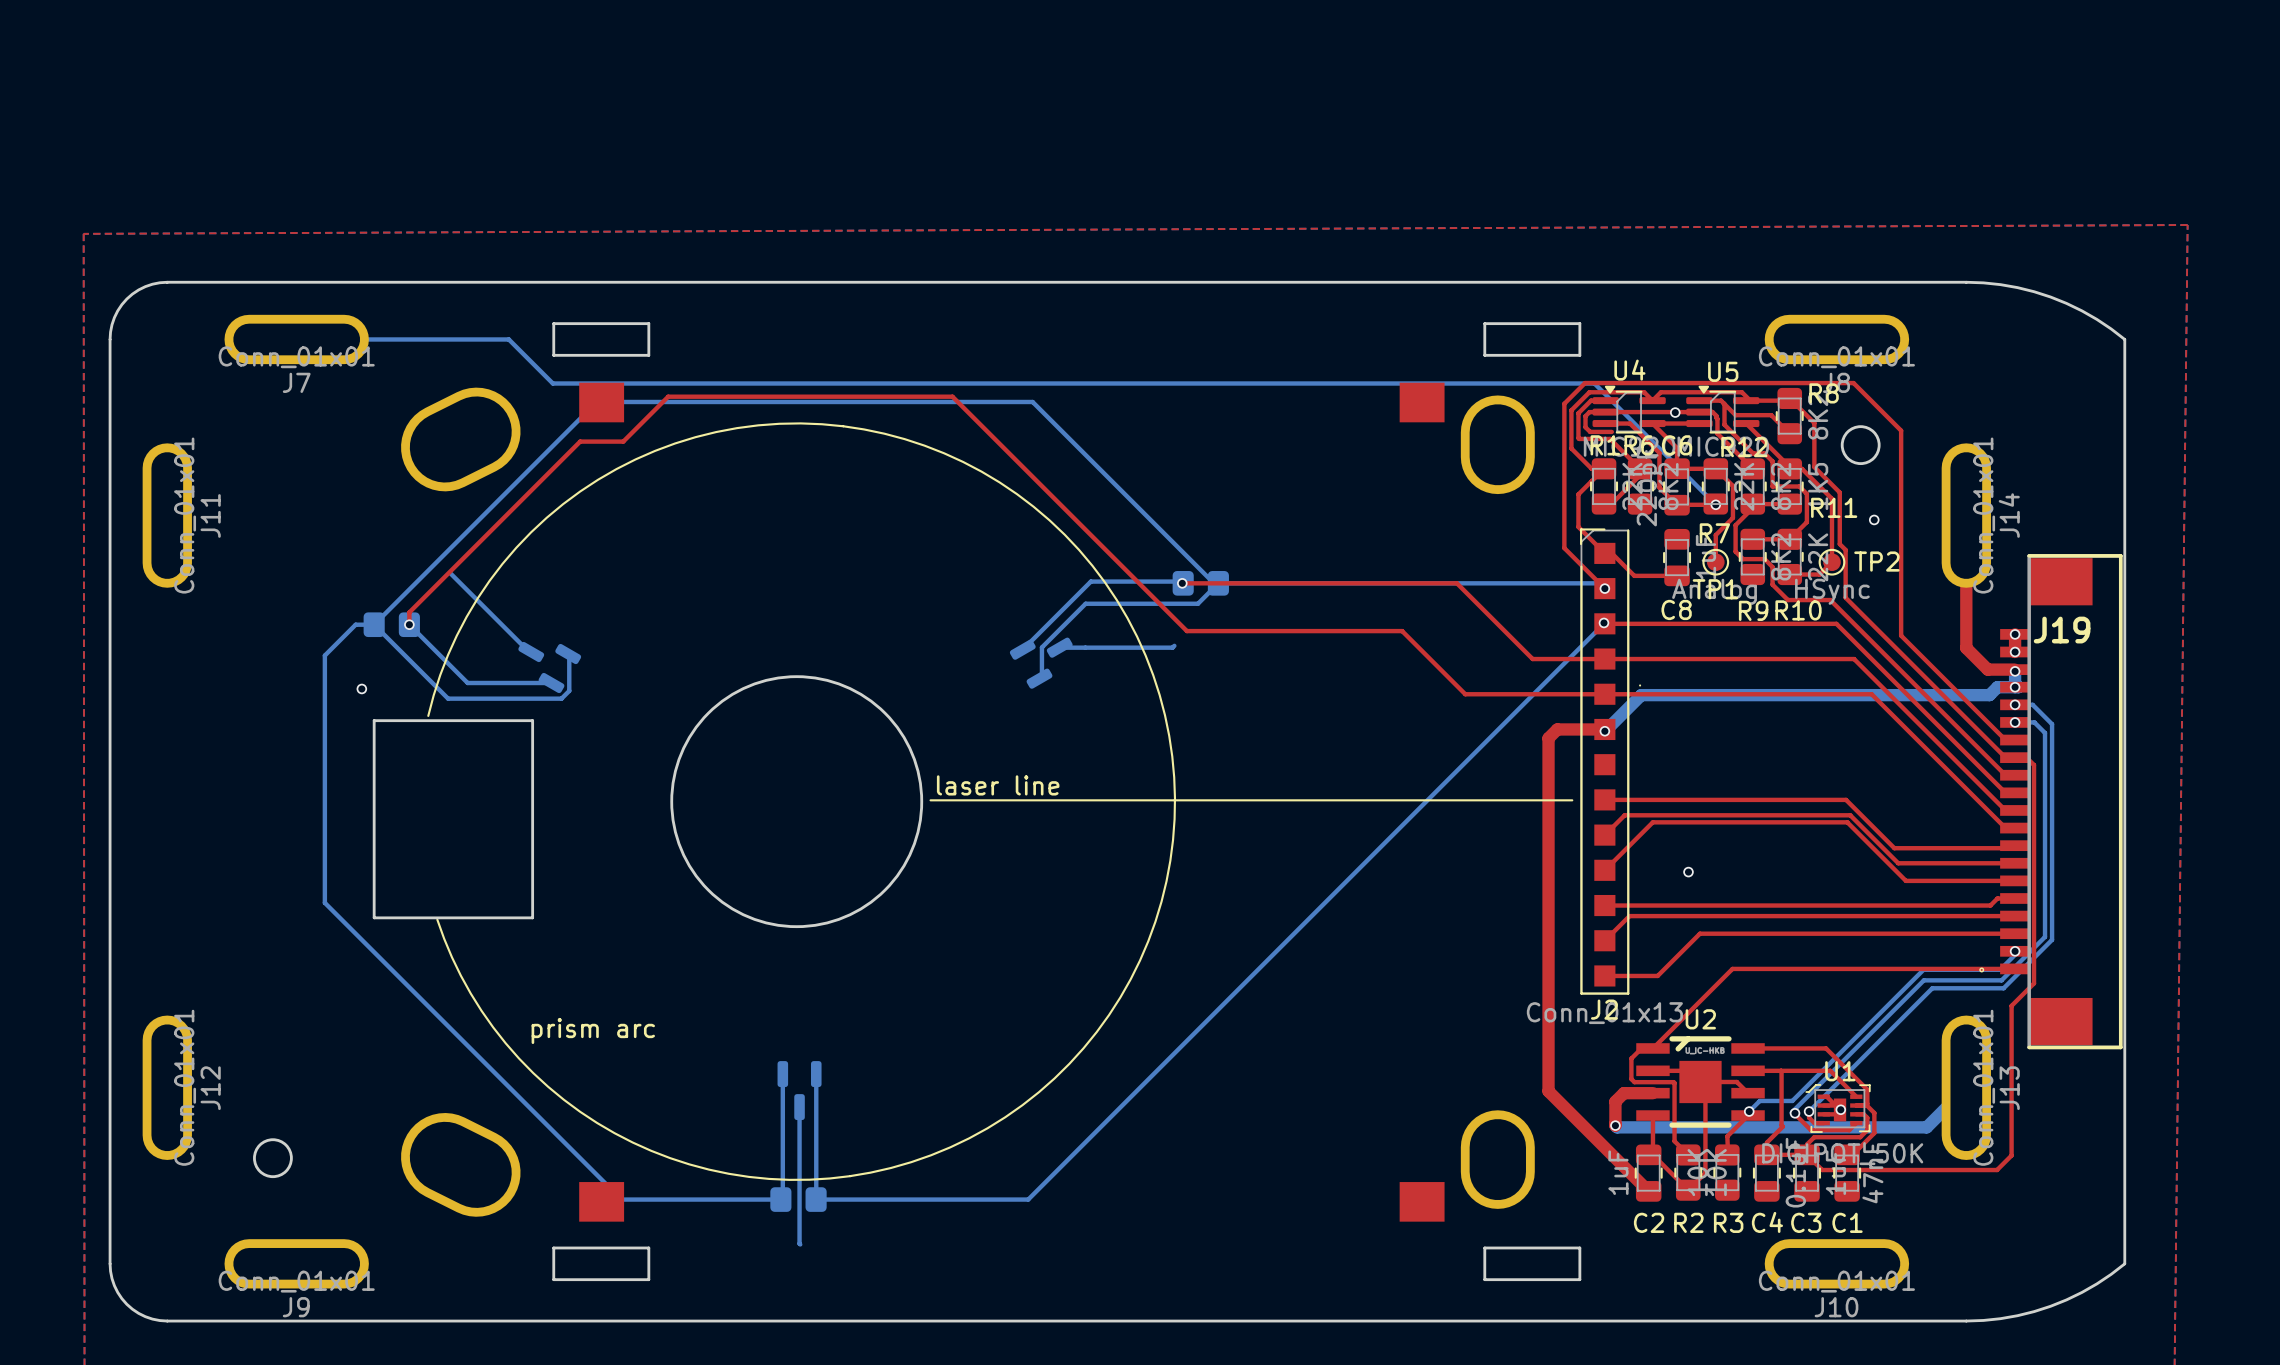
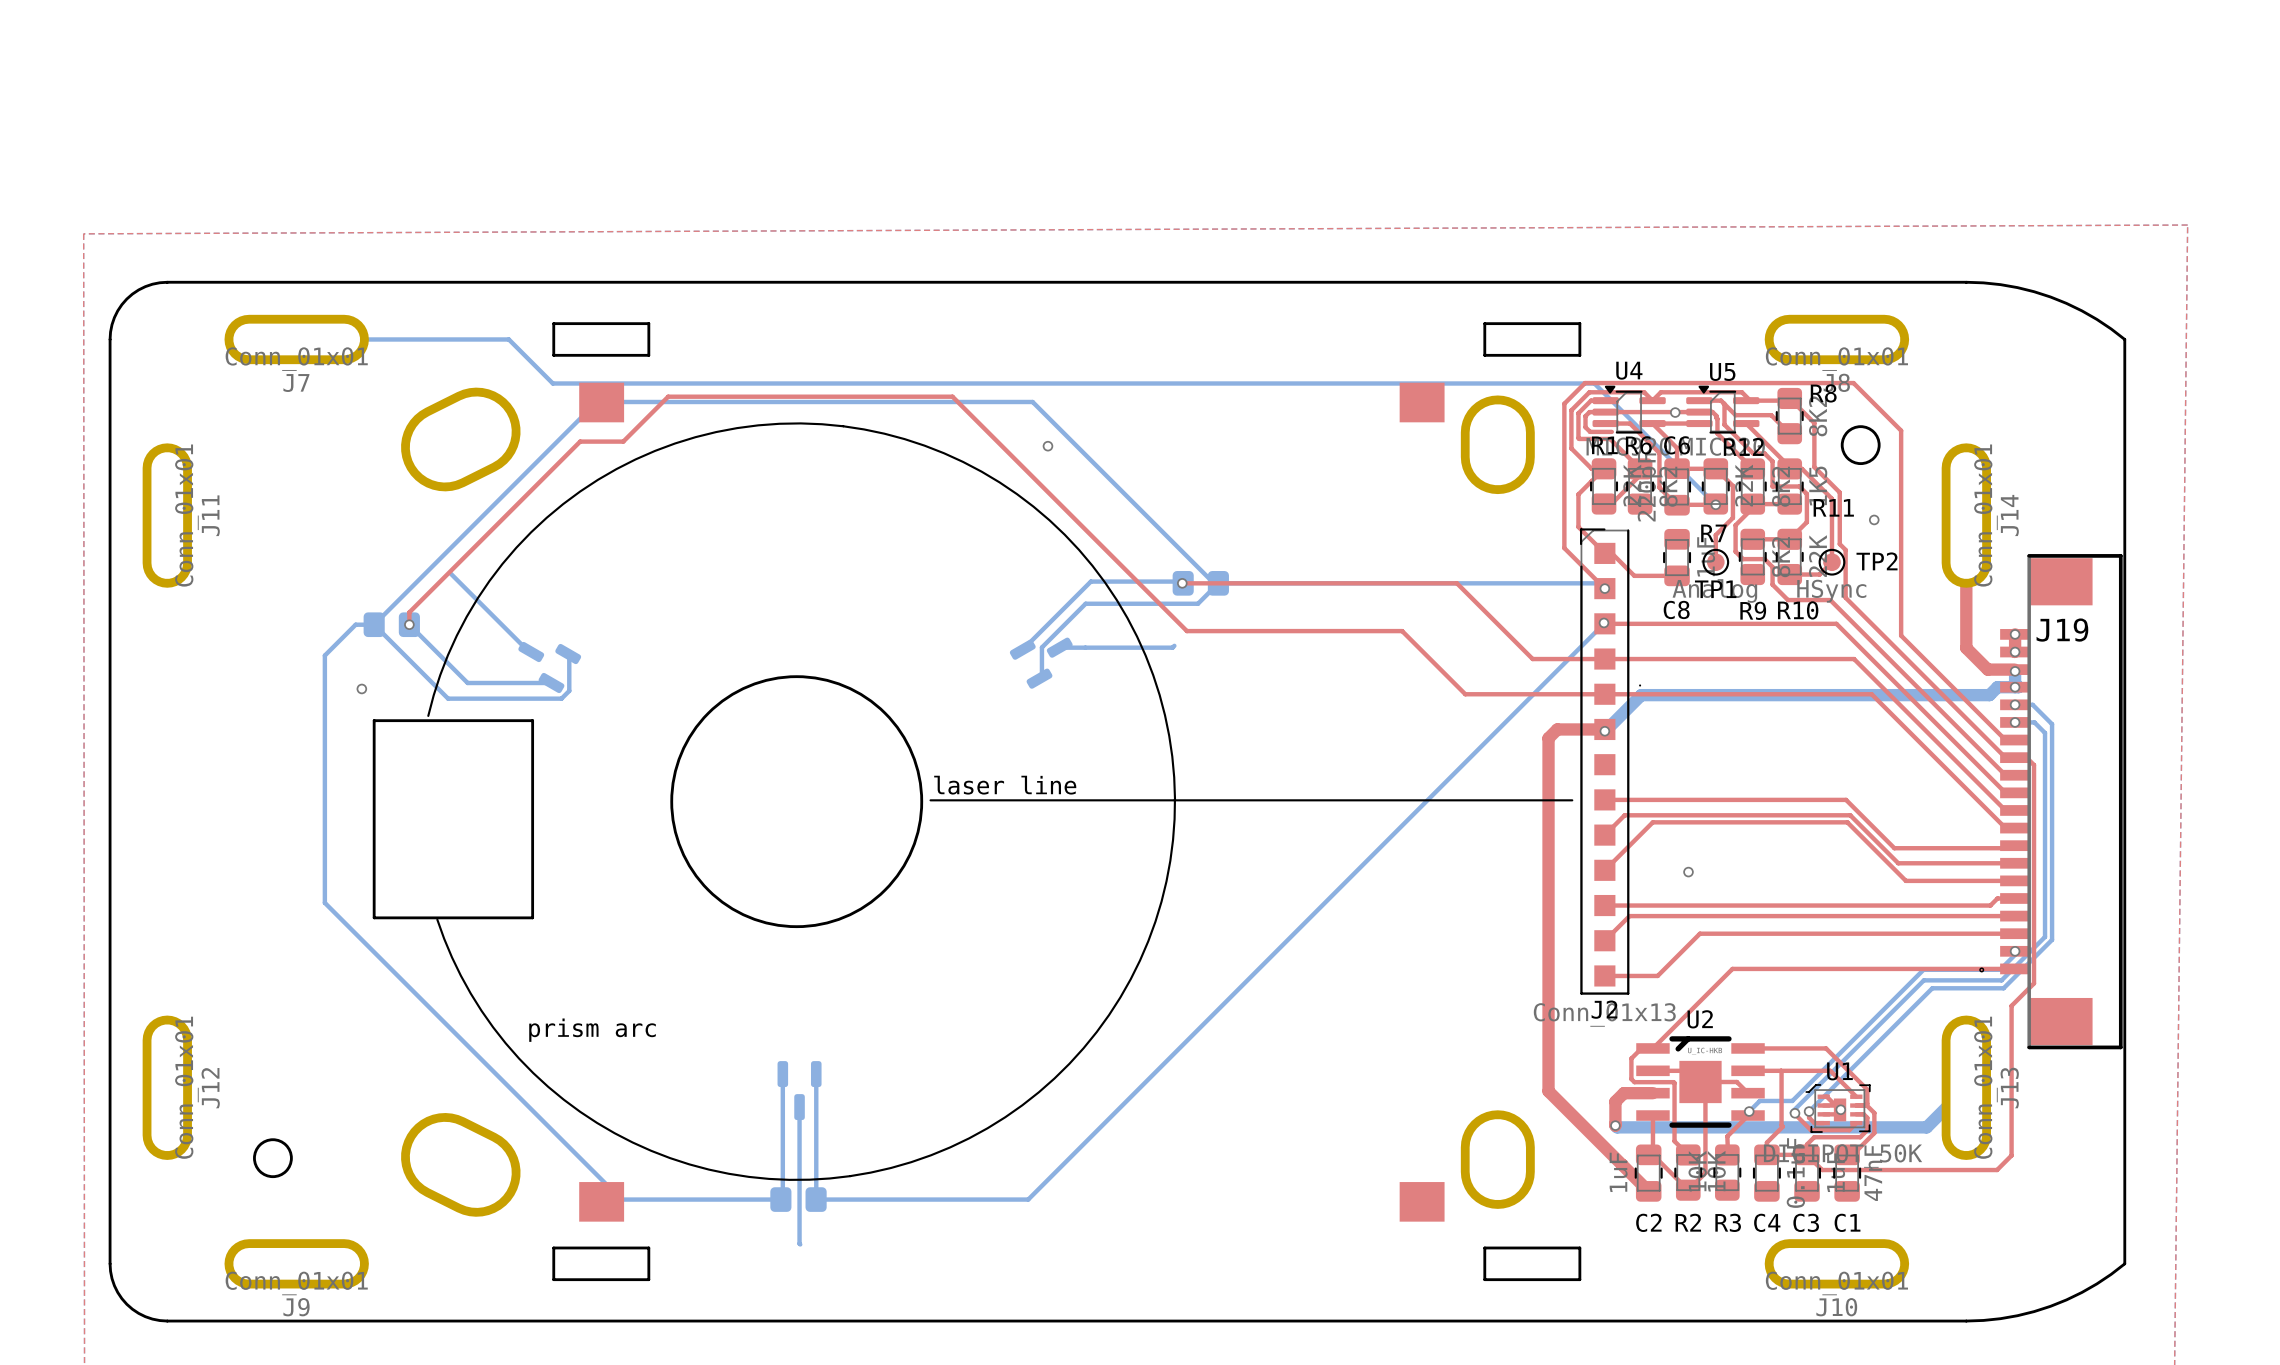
via: none -> (1047, 446)

